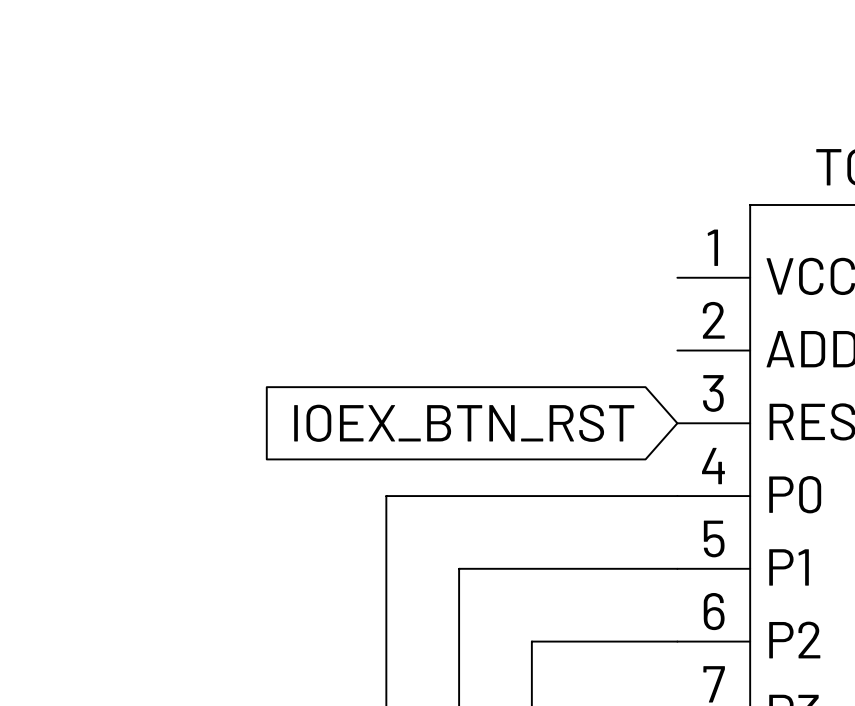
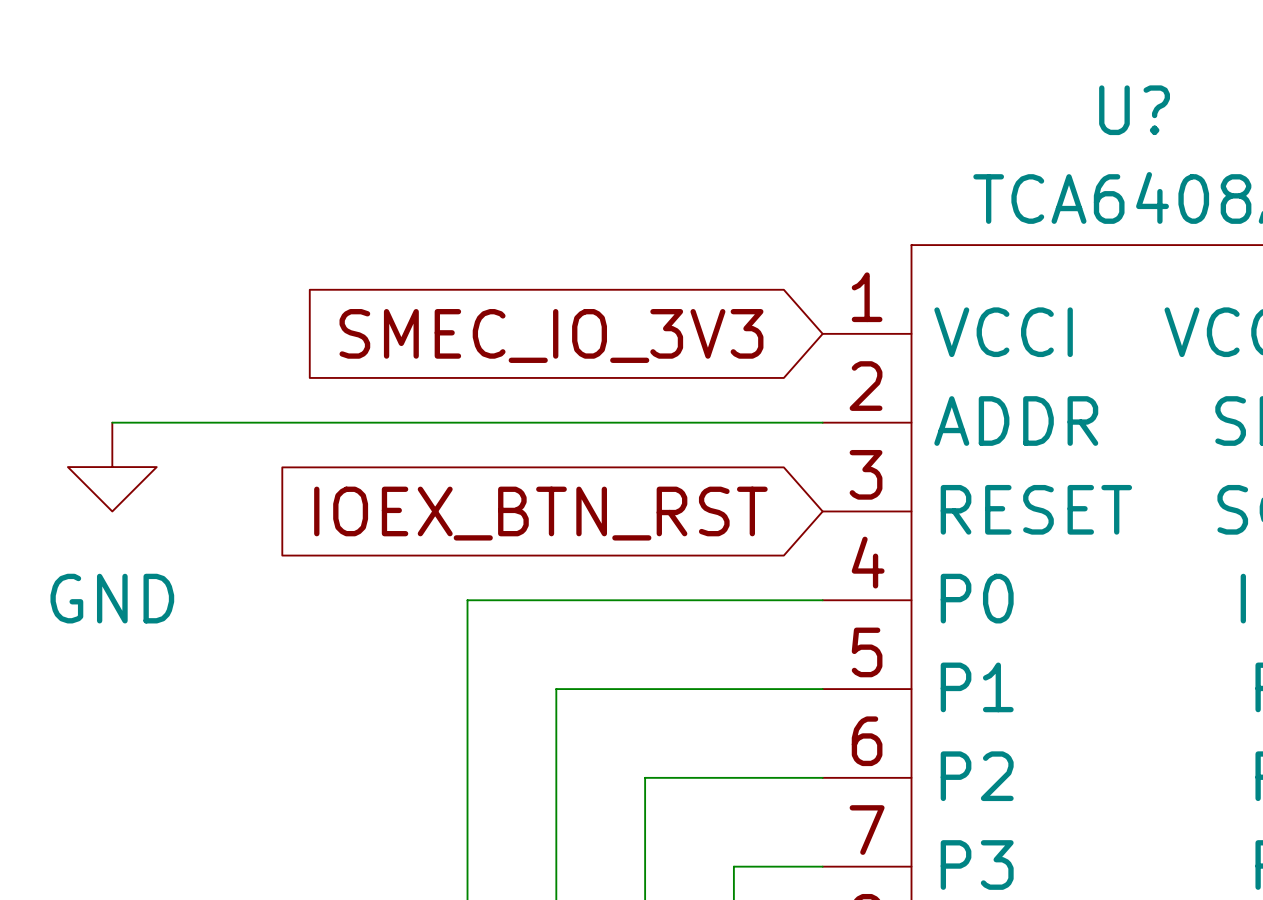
global label: none -> SMEC_IO_3V3 (551, 335)
wire: none -> (112, 422) (822, 422)
power symbol: none -> GND (112, 467)

